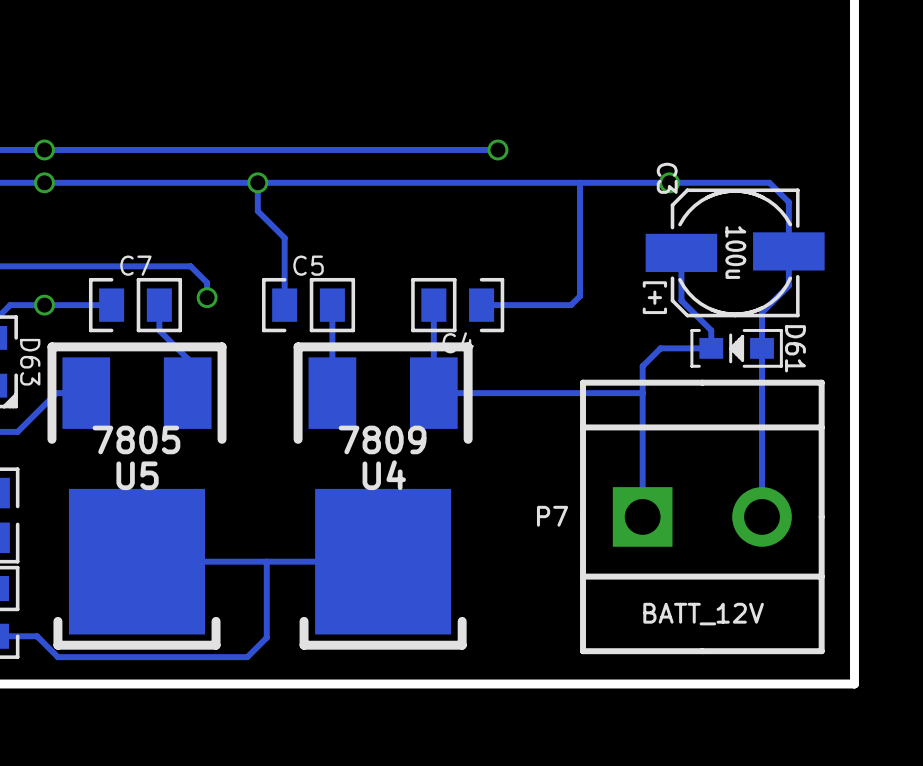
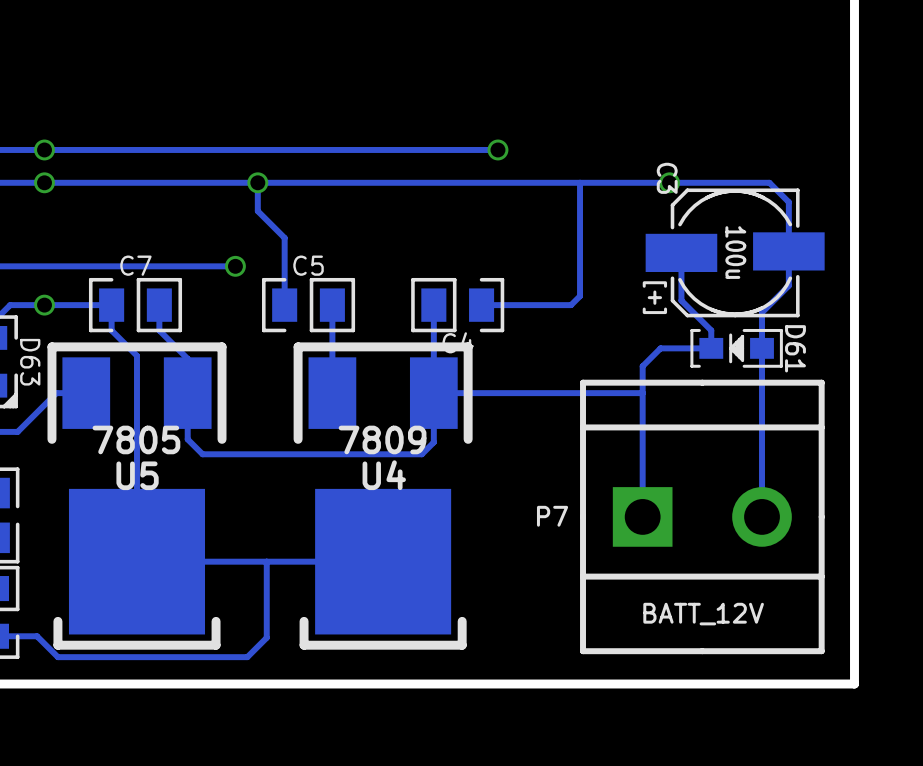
track: (190, 266) (207, 282) (207, 297) -> (190, 266) (235, 266)
via position: (207, 297) -> (235, 266)
track: none -> (111, 305) (111, 330) (136, 355) (136, 561)
track: none -> (433, 393) (433, 442) (421, 454) (202, 454) (187, 439) (187, 393)

